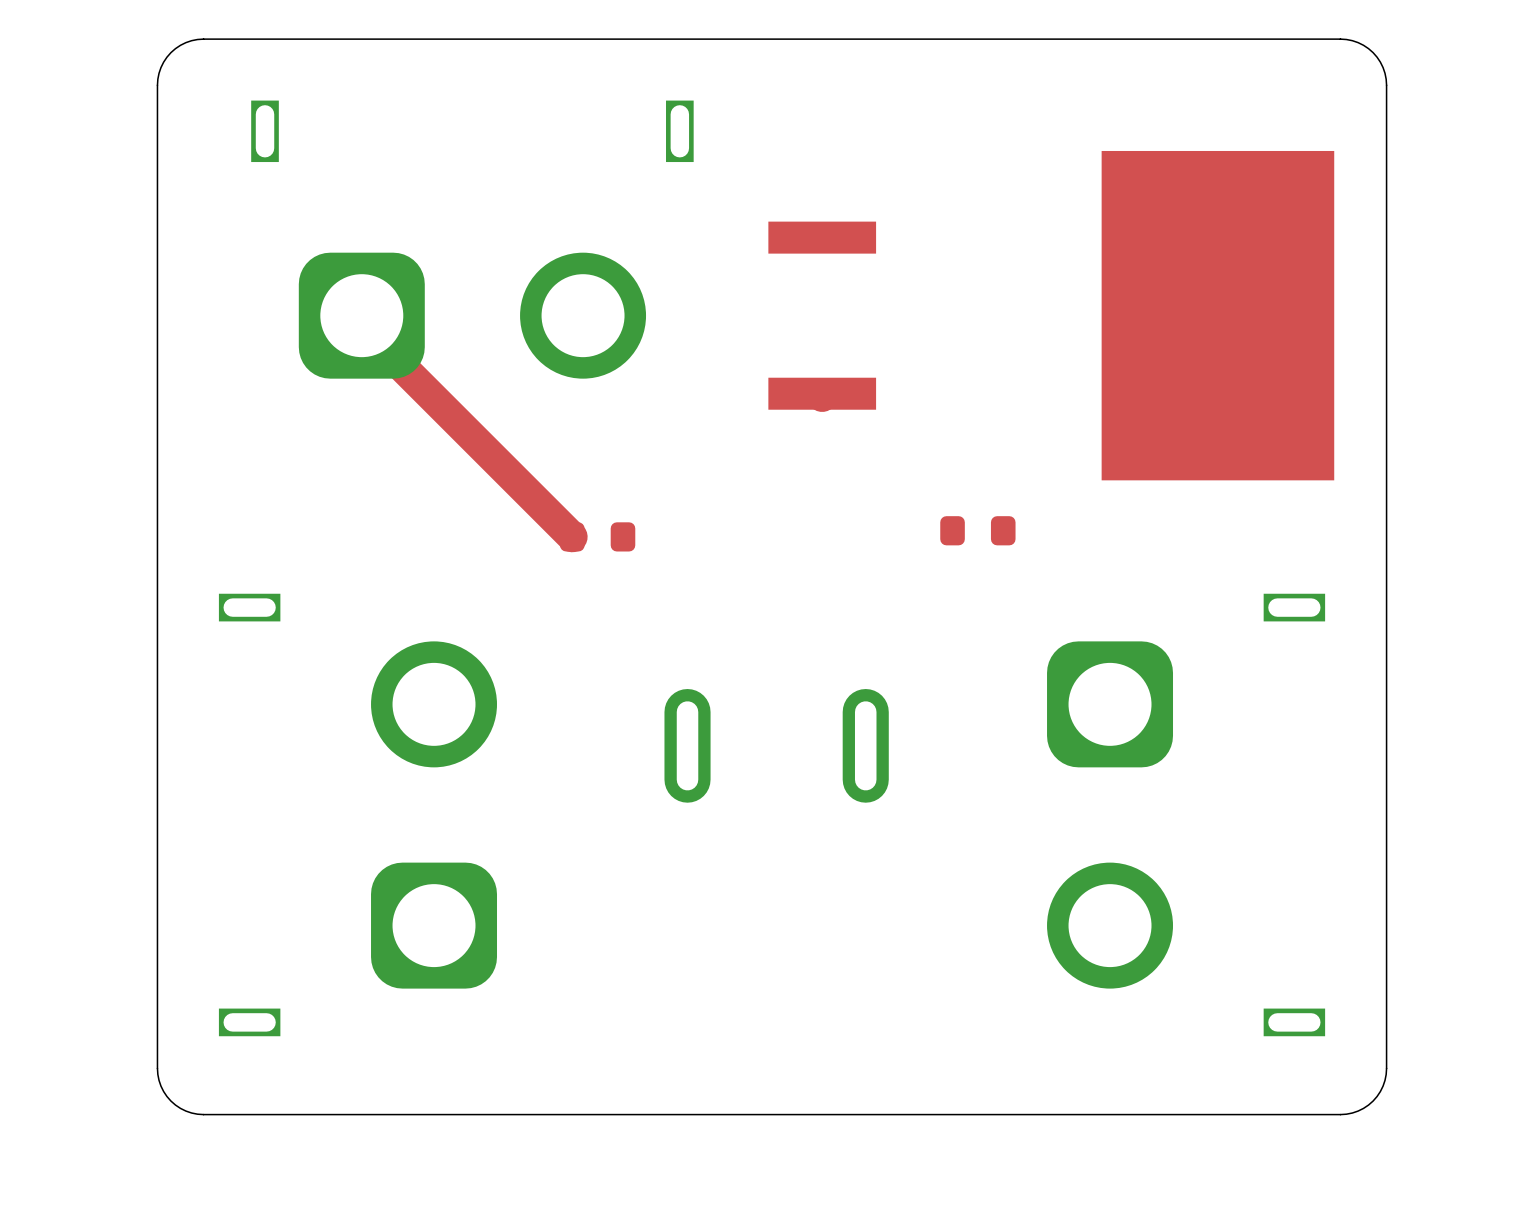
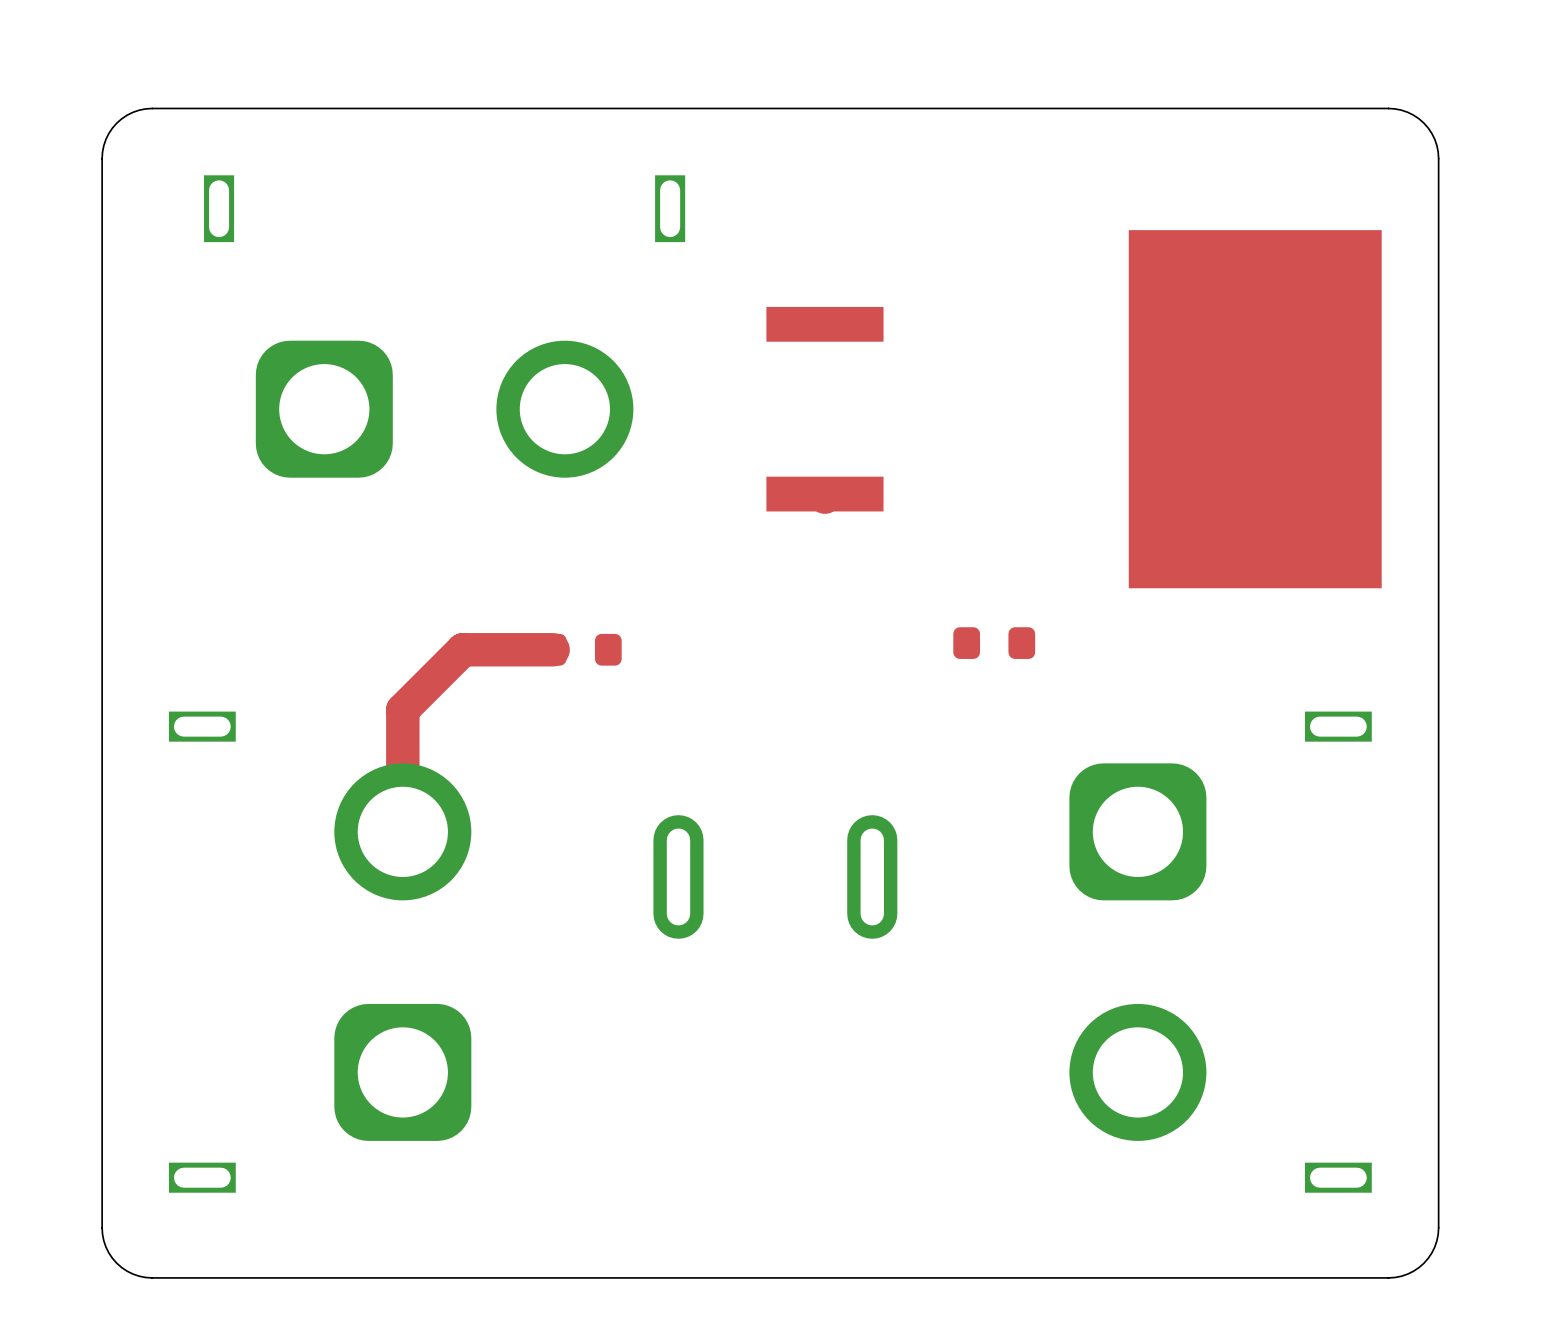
top track: (361, 315) (361, 326) (572, 536) -> (402, 831) (402, 709) (462, 649) (553, 649)

